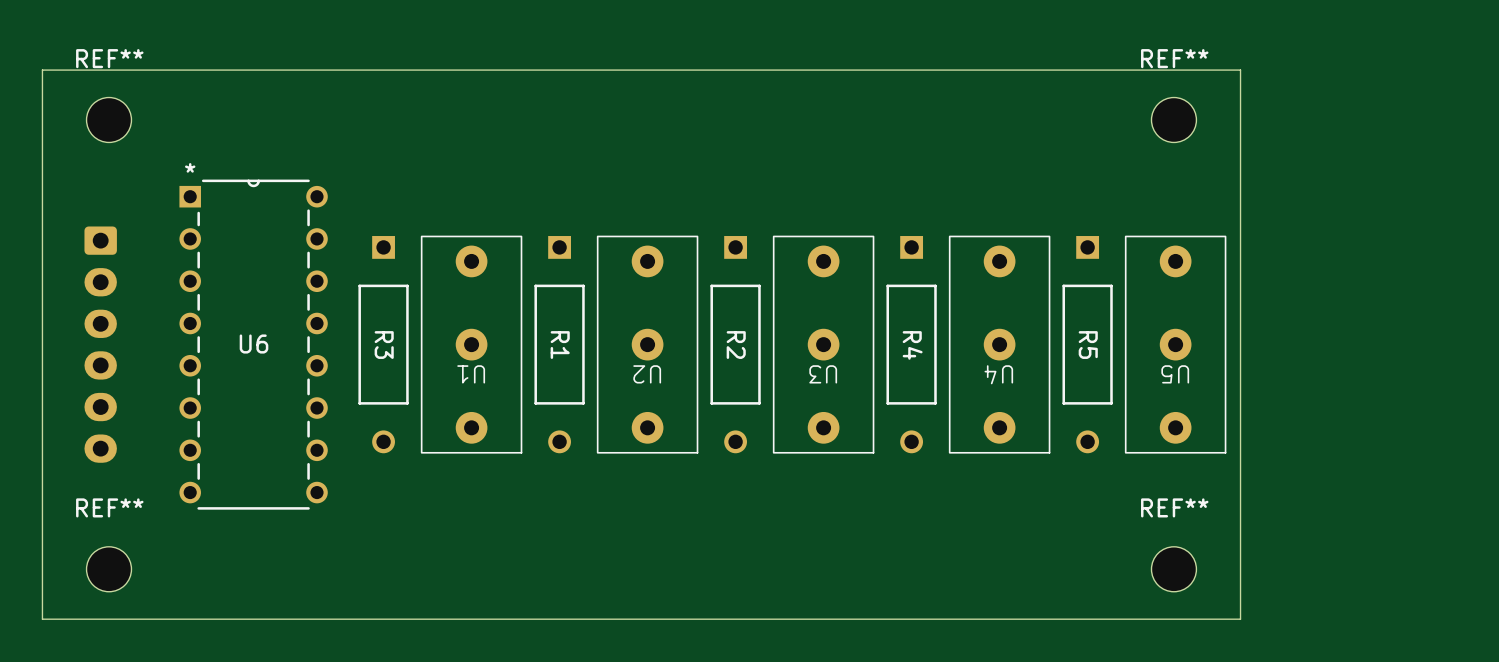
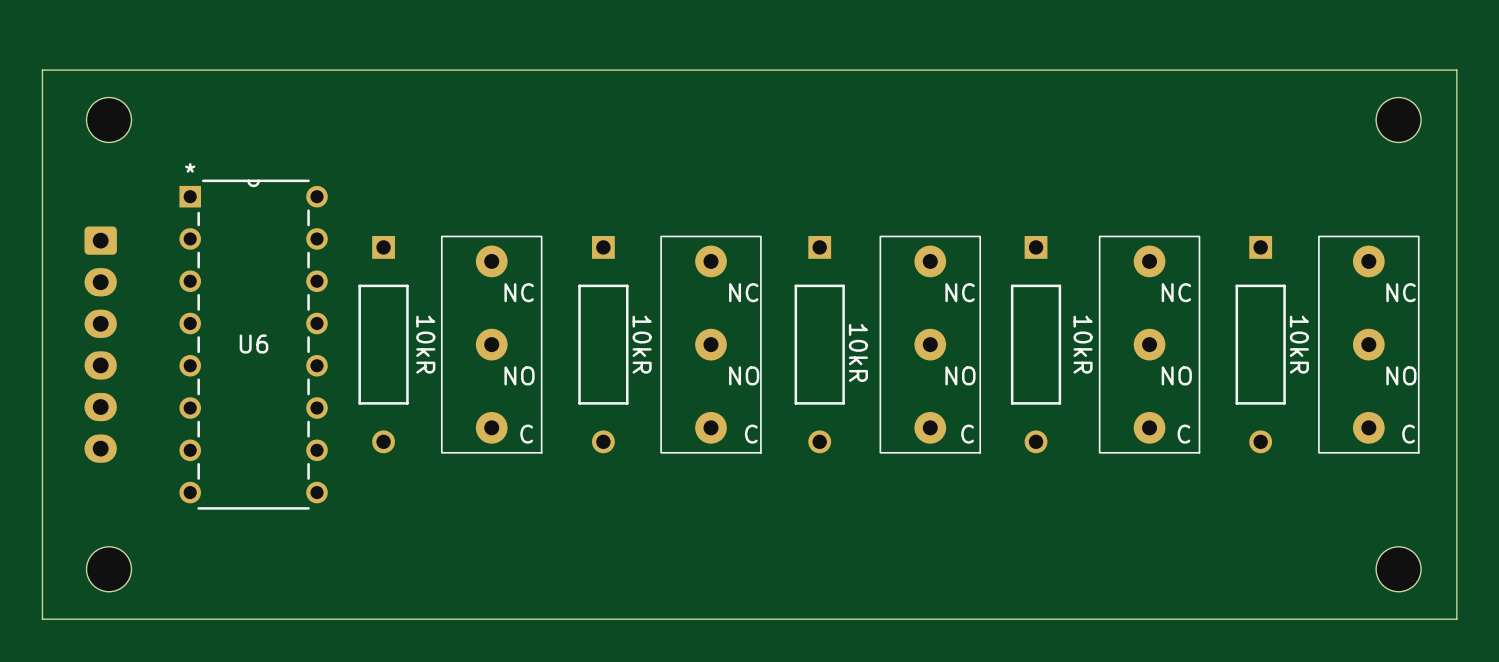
REF** name: REF** (109, 58) -> none
board edge: (1240, 70) (1240, 619) -> (1240, 70) (1456, 70) (1456, 619) (1240, 619)
REF**: (1173, 119) -> none
part: none -> (1398, 119)
text: none -> NC (519, 292)
text: none -> NC (743, 292)
text: none -> NC (960, 292)
text: none -> NC (1176, 292)
text: none -> NC (1401, 292)
U1: (471, 344) -> none
part: none -> (491, 344)
R1: (559, 344) -> none
10kR: none -> (603, 344)
U2: (647, 344) -> none
part: none -> (711, 344)
R2: (735, 344) -> none
10kR: none -> (819, 344)
U3: (823, 344) -> none
R4: (911, 344) -> none
part: none -> (930, 344)
U4: (999, 344) -> none
10kR: none -> (1036, 344)
R5: (1087, 344) -> none
part: none -> (1149, 344)
U5: (1175, 344) -> none
10kR: none -> (1260, 344)
part: none -> (1368, 344)
R3 name: R3 (384, 345) -> 10kR (425, 344)
text: none -> NO (519, 375)
text: none -> NO (744, 375)
text: none -> NO (960, 375)
text: none -> NO (1176, 375)
text: none -> NO (1401, 375)
text: none -> C (526, 434)
text: none -> C (751, 434)
text: none -> C (967, 434)
text: none -> C (1183, 434)
text: none -> C (1408, 434)
REF** name: REF** (109, 507) -> none
REF**: (1173, 569) -> none
part: none -> (1398, 569)

